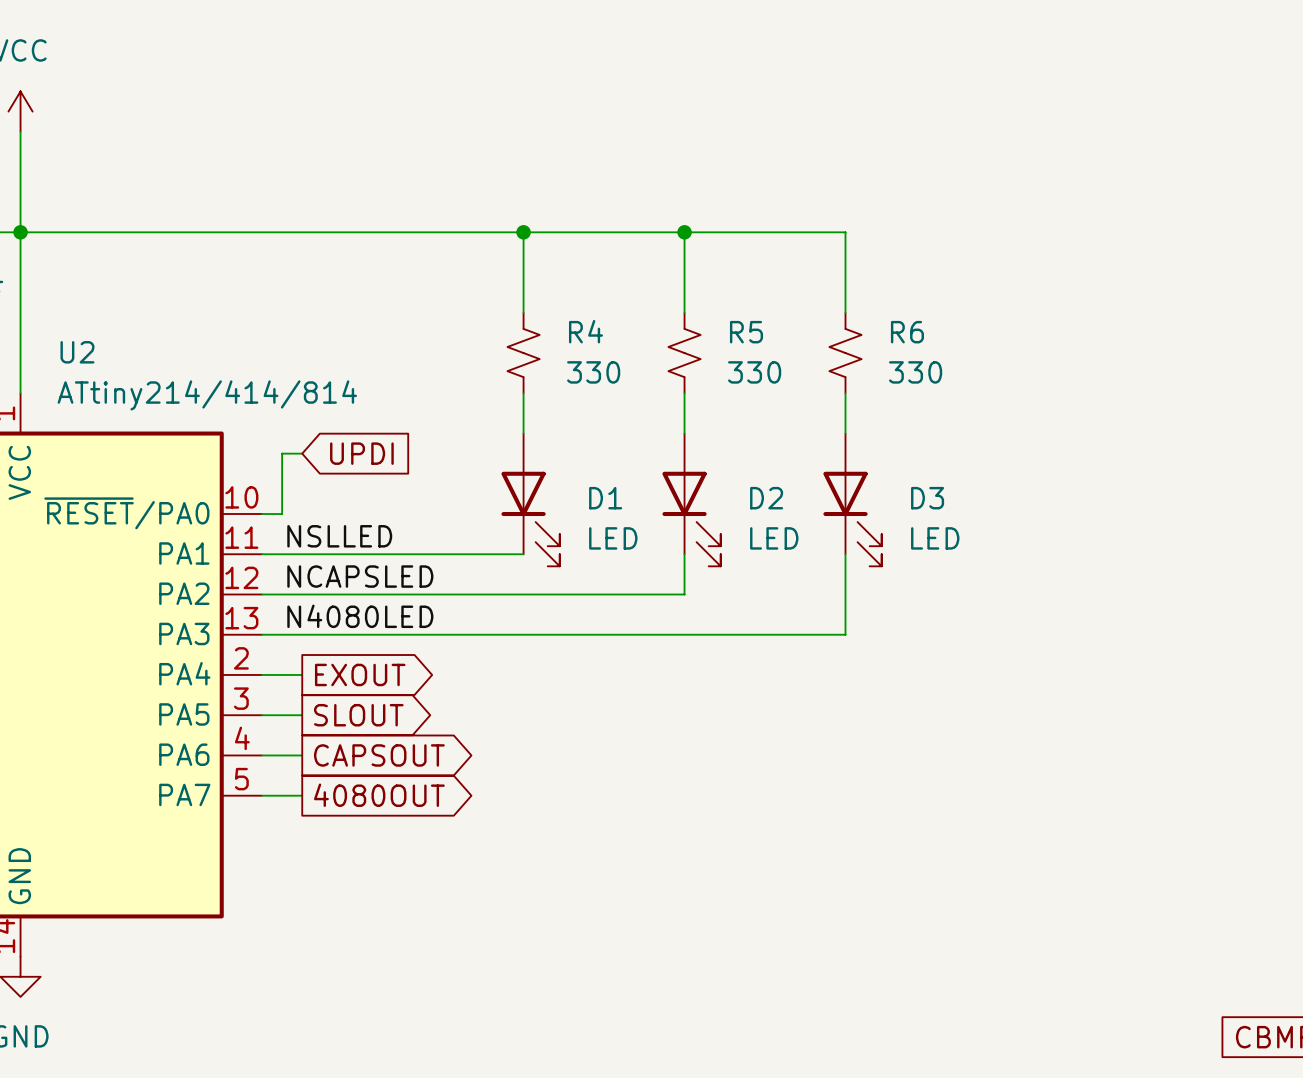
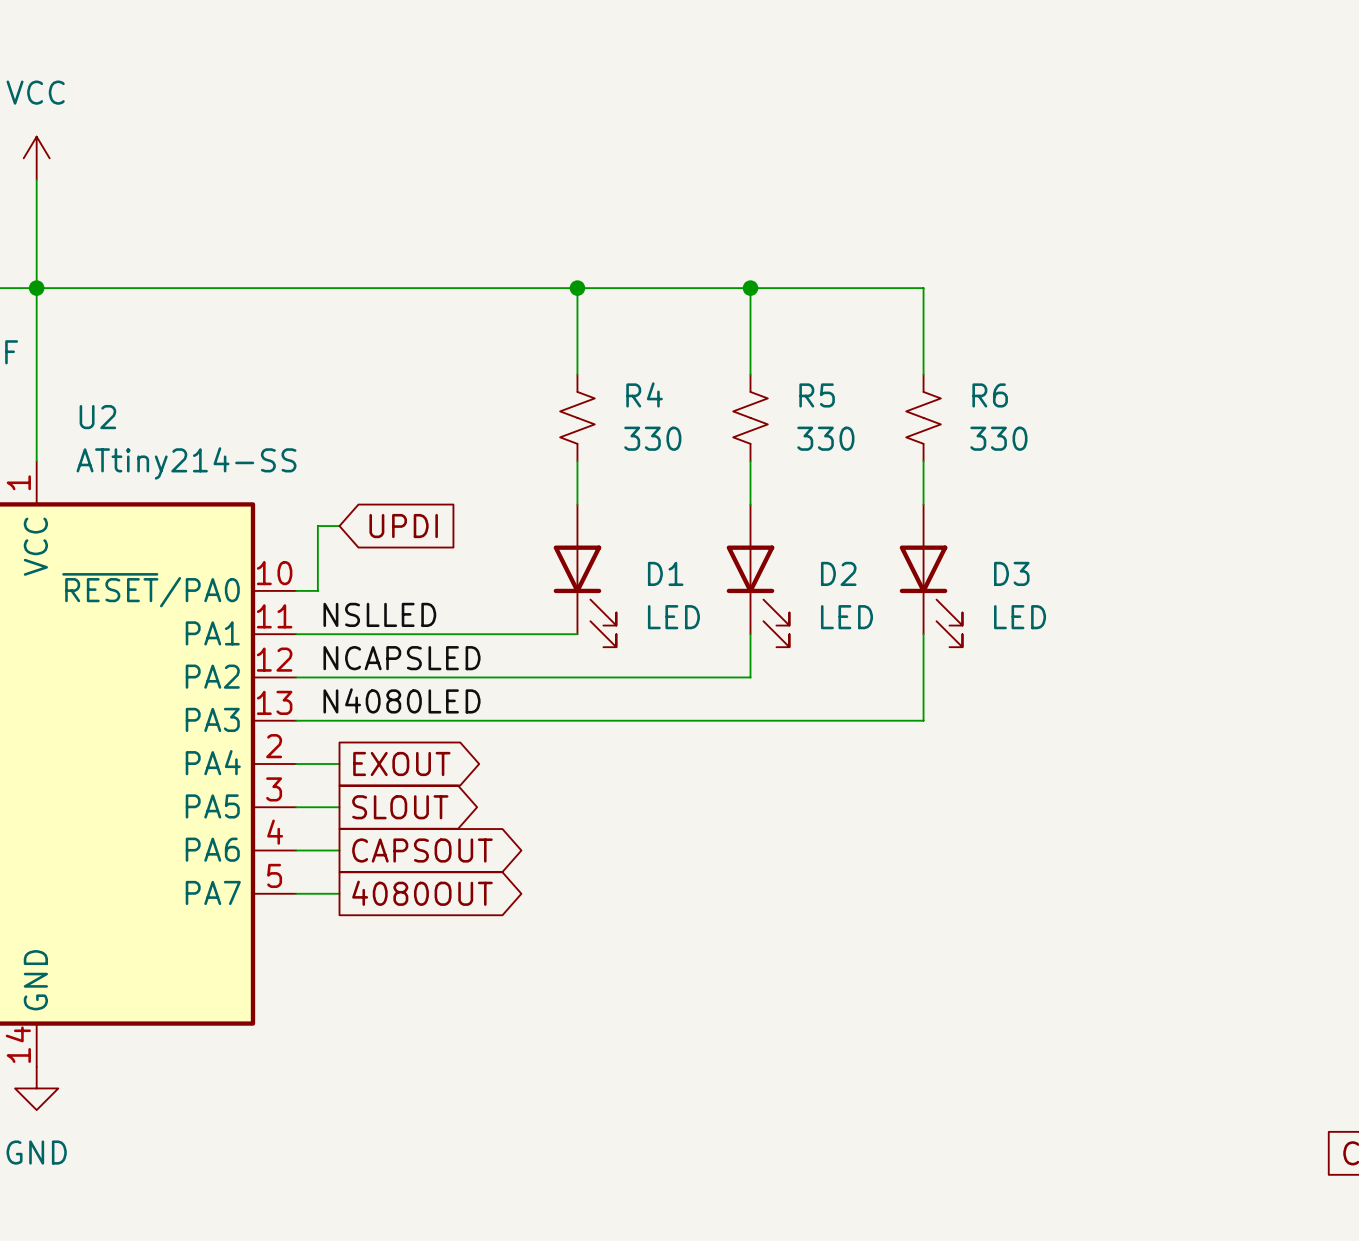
U2 value: ATtiny214/414/814 (207, 395) -> ATtiny214-SS (186, 463)

